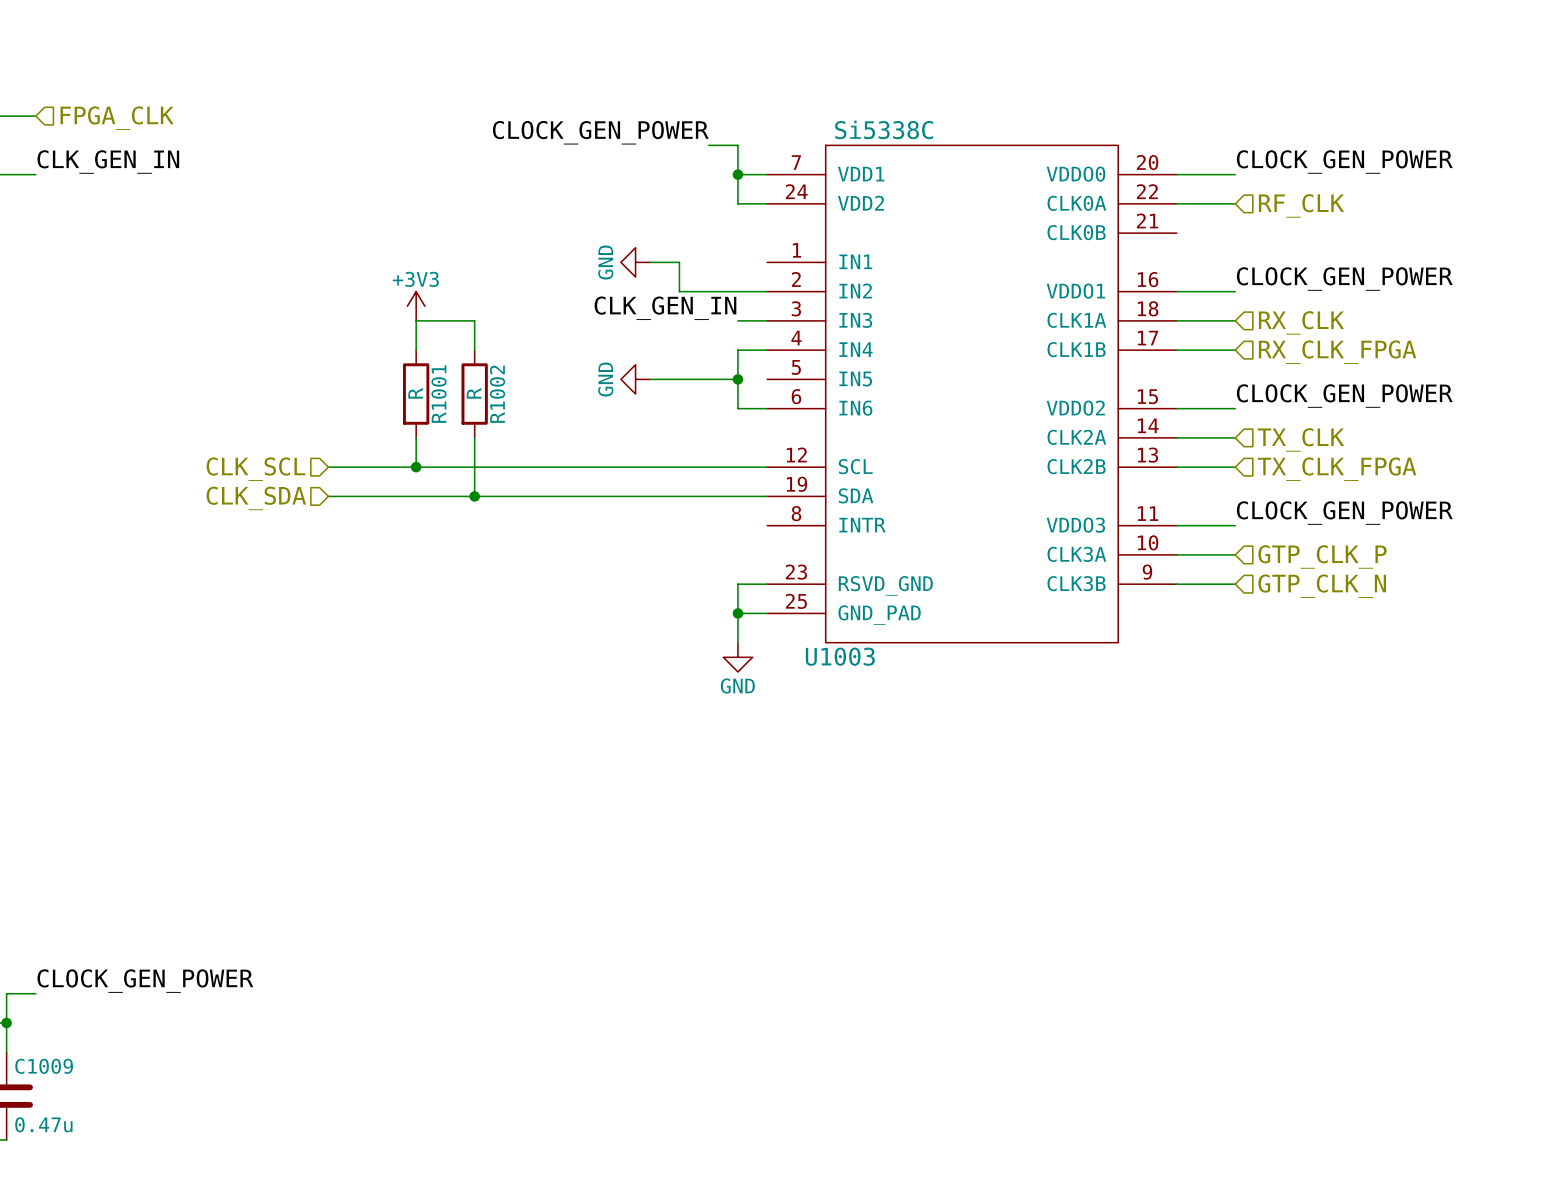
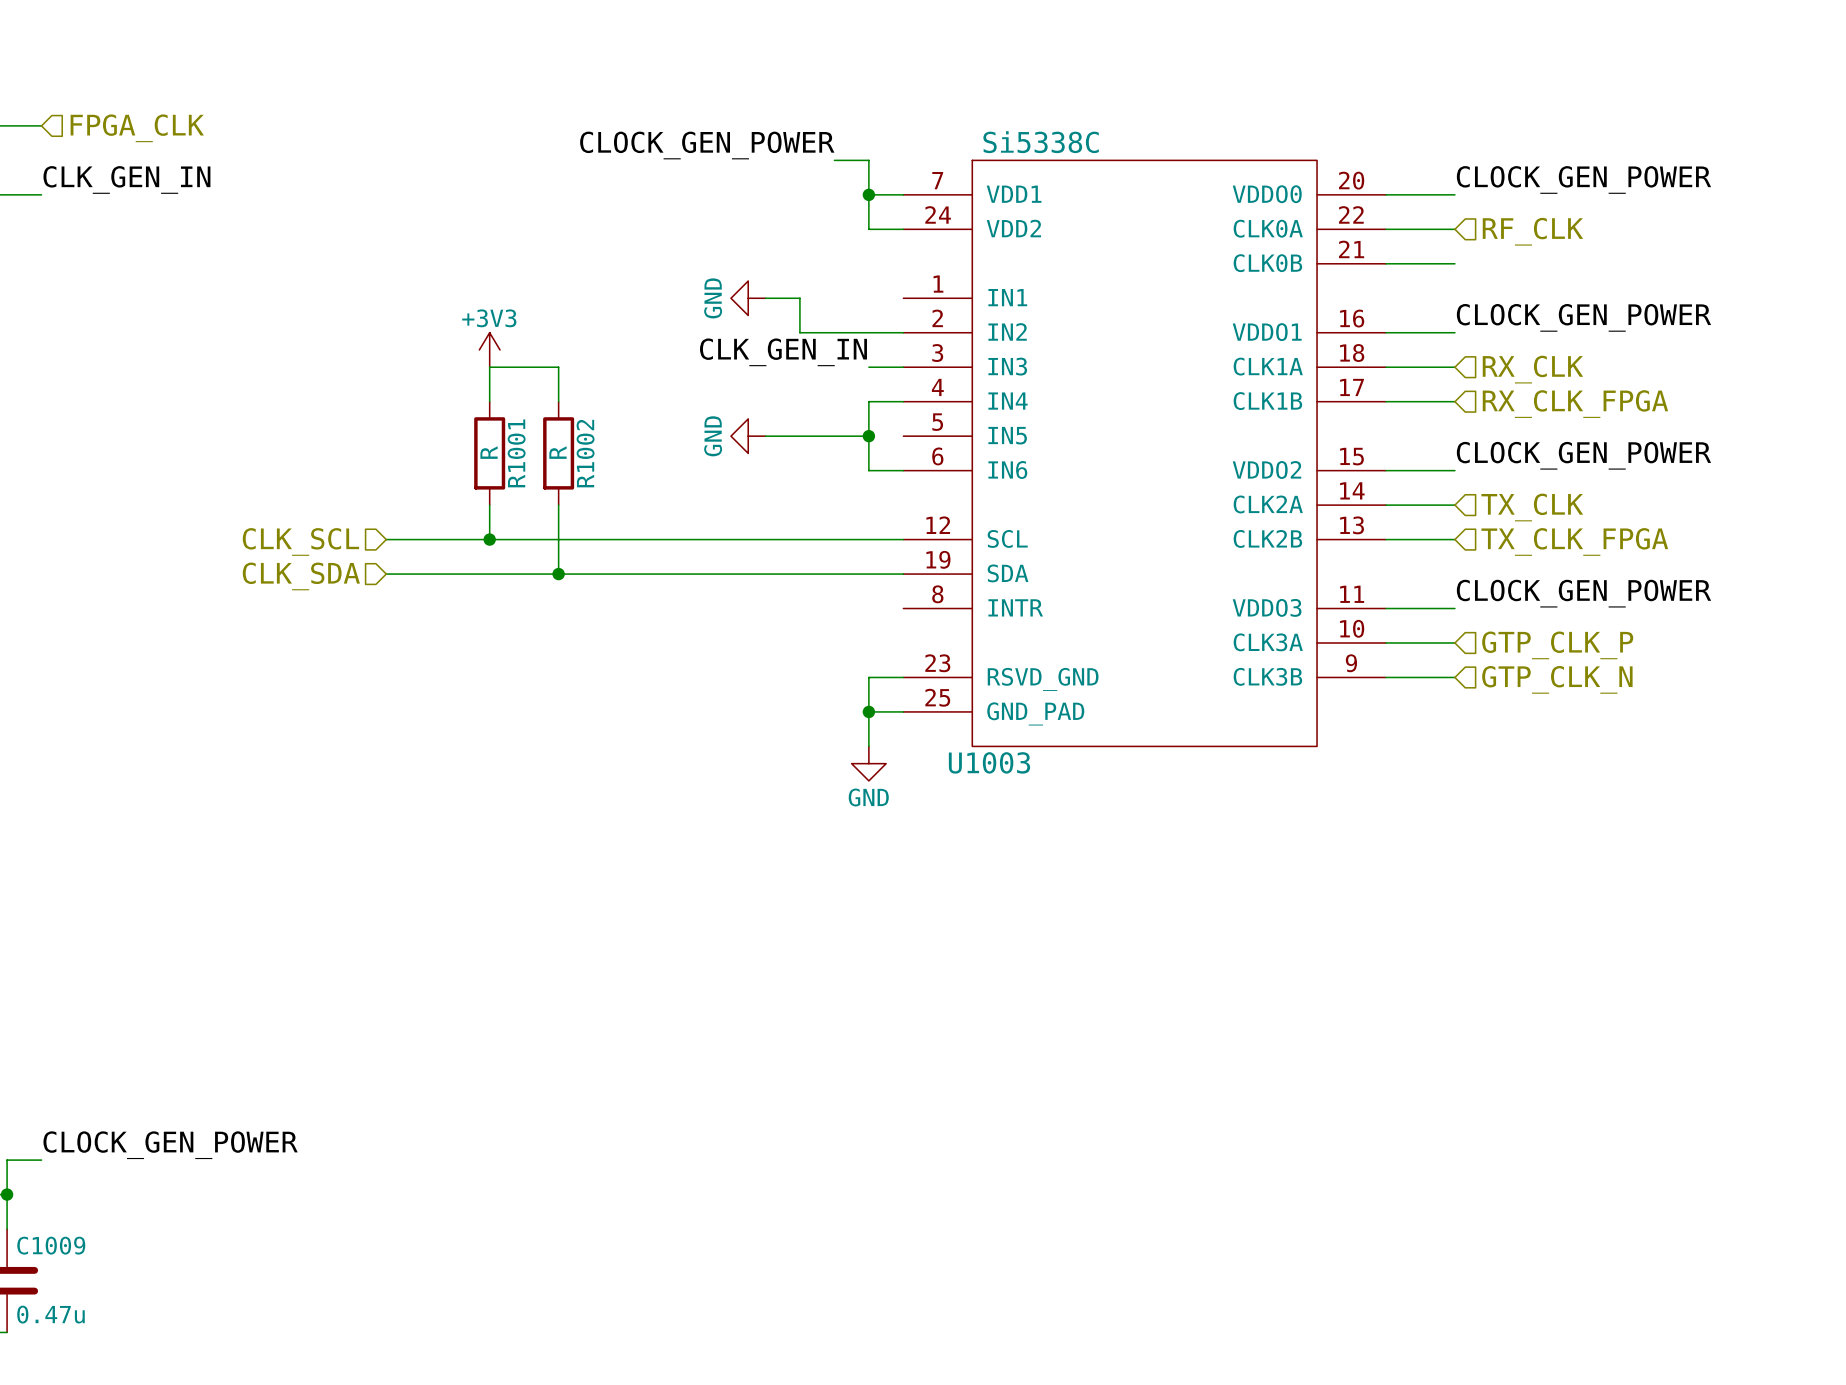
wire: none -> (1385, 263) (1454, 263)

